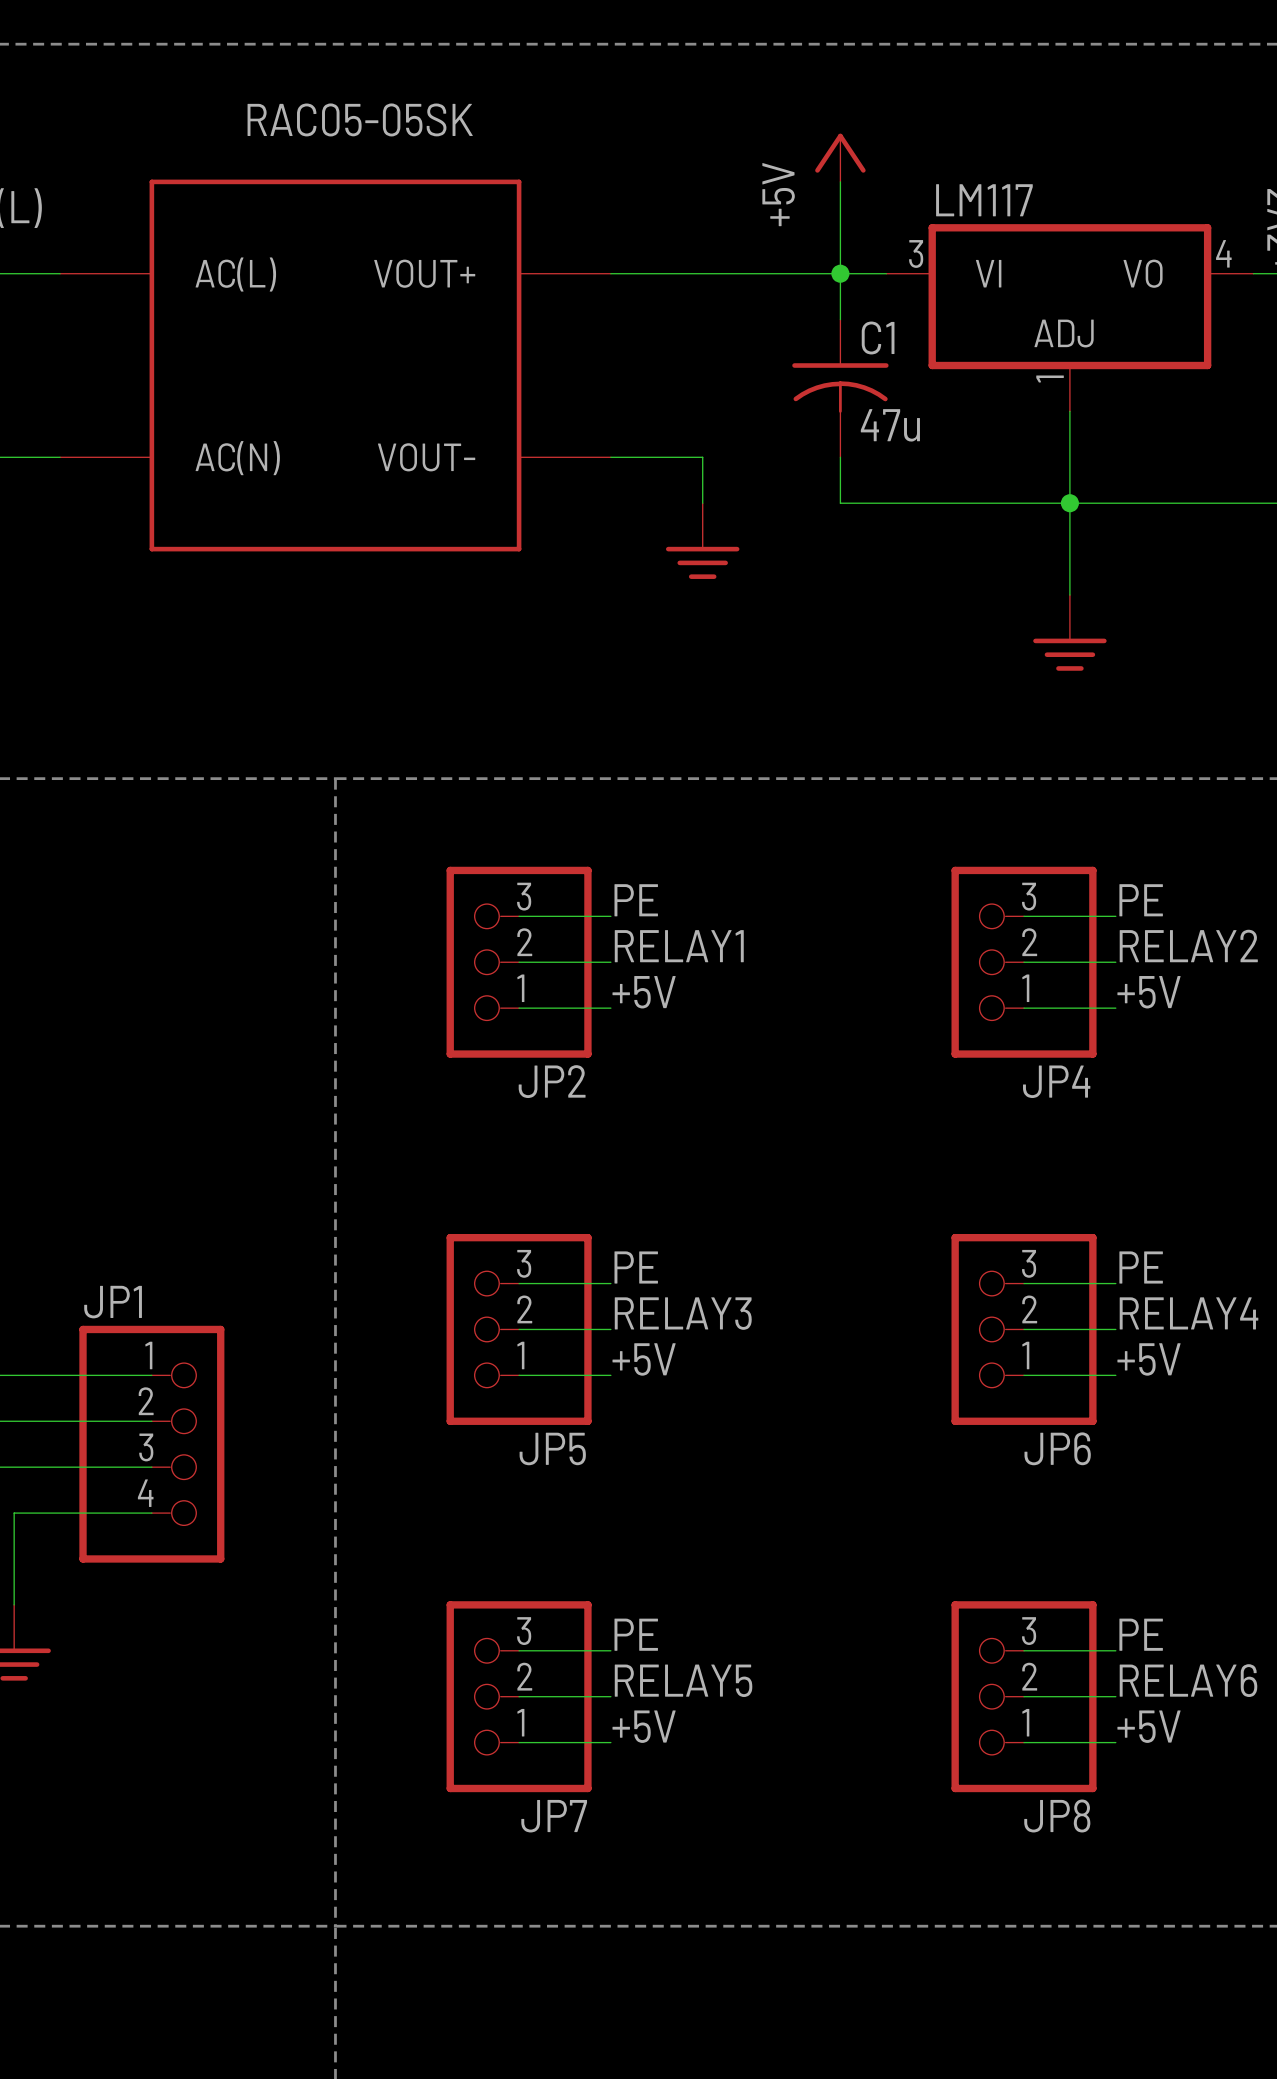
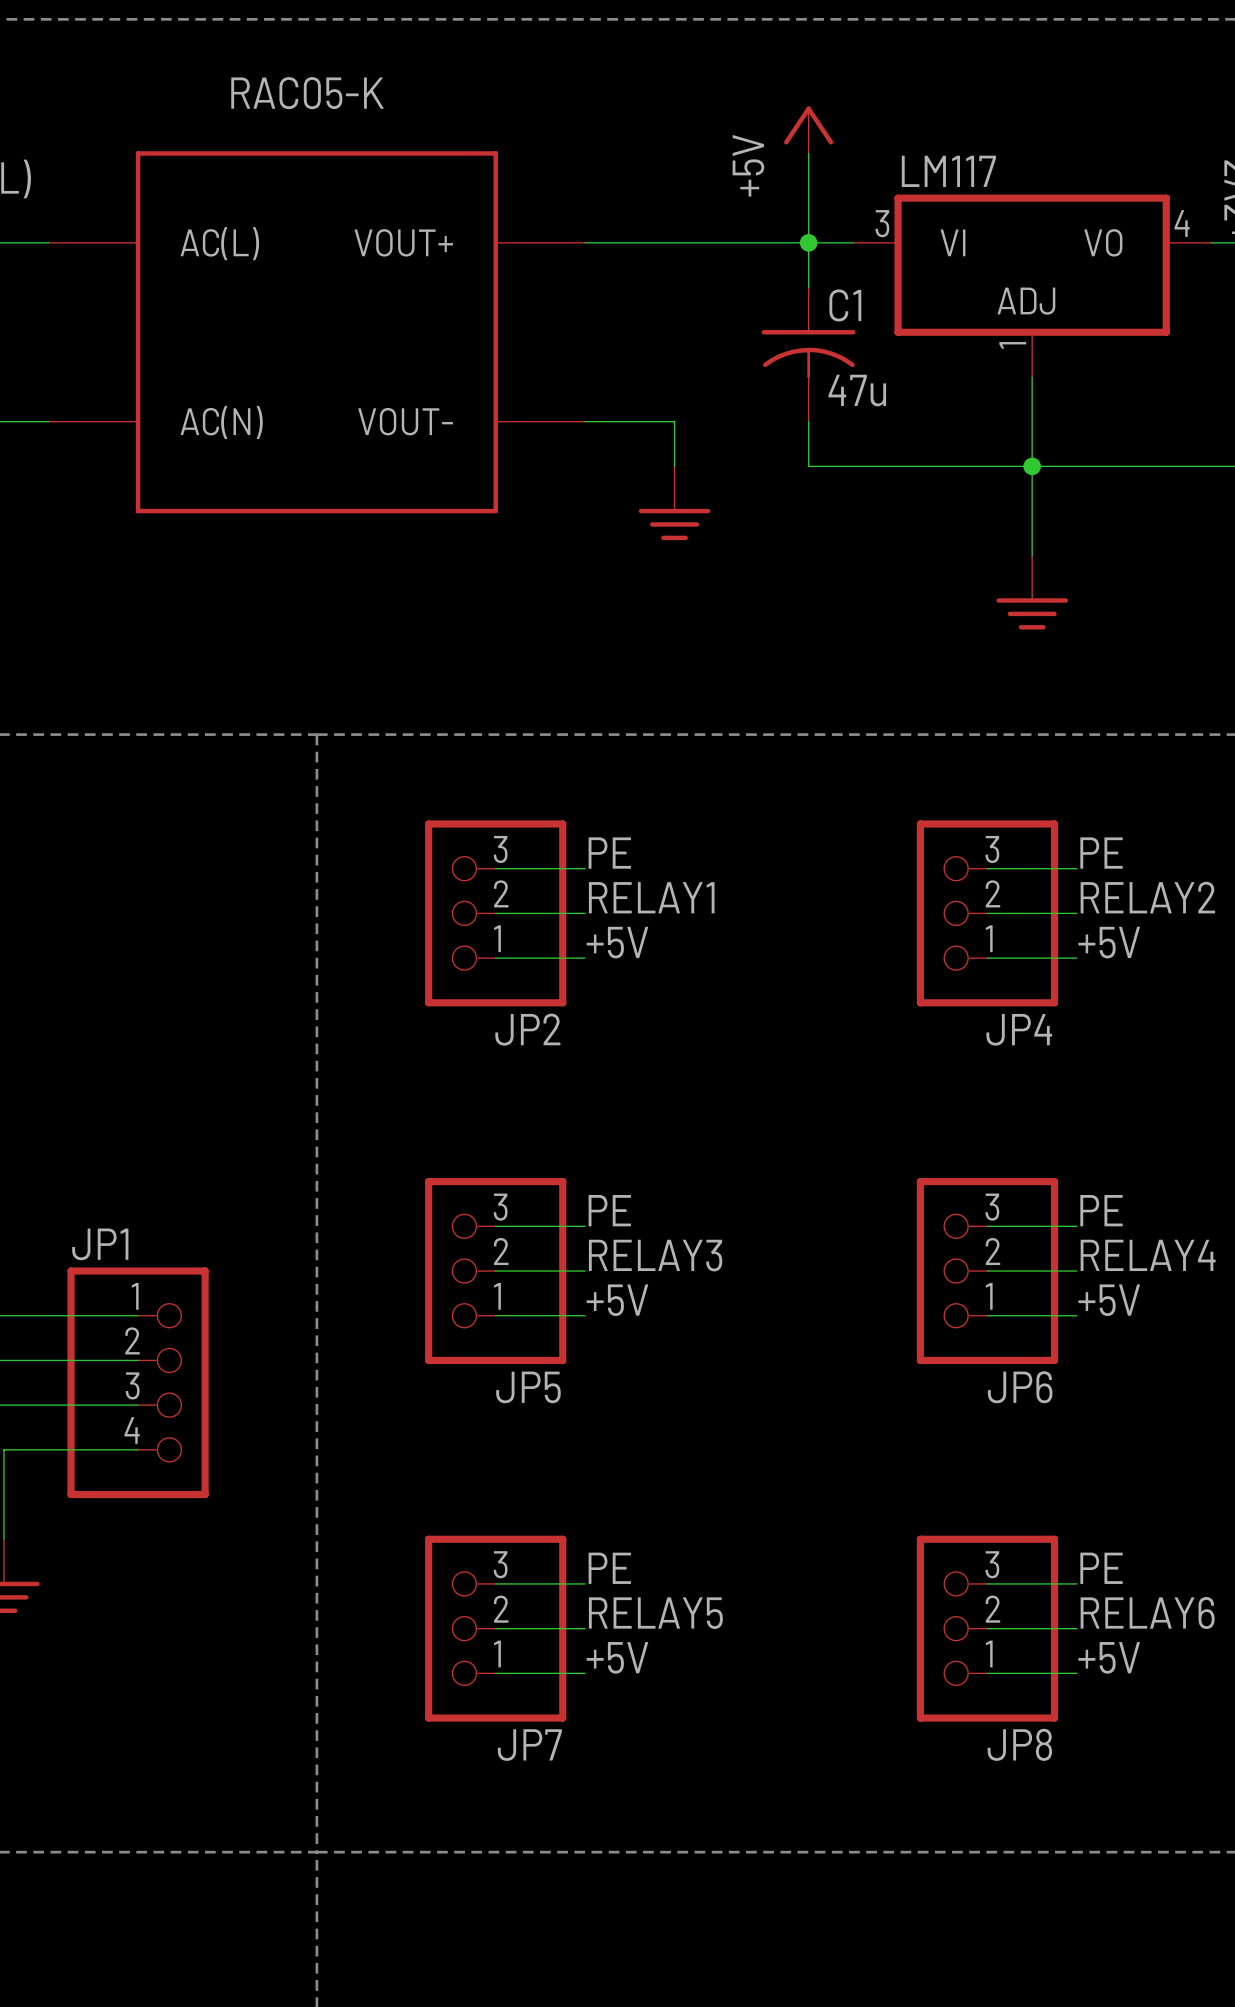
RAC05-05SK name: RAC05-05SK (360, 119) -> RAC05-K (307, 93)

